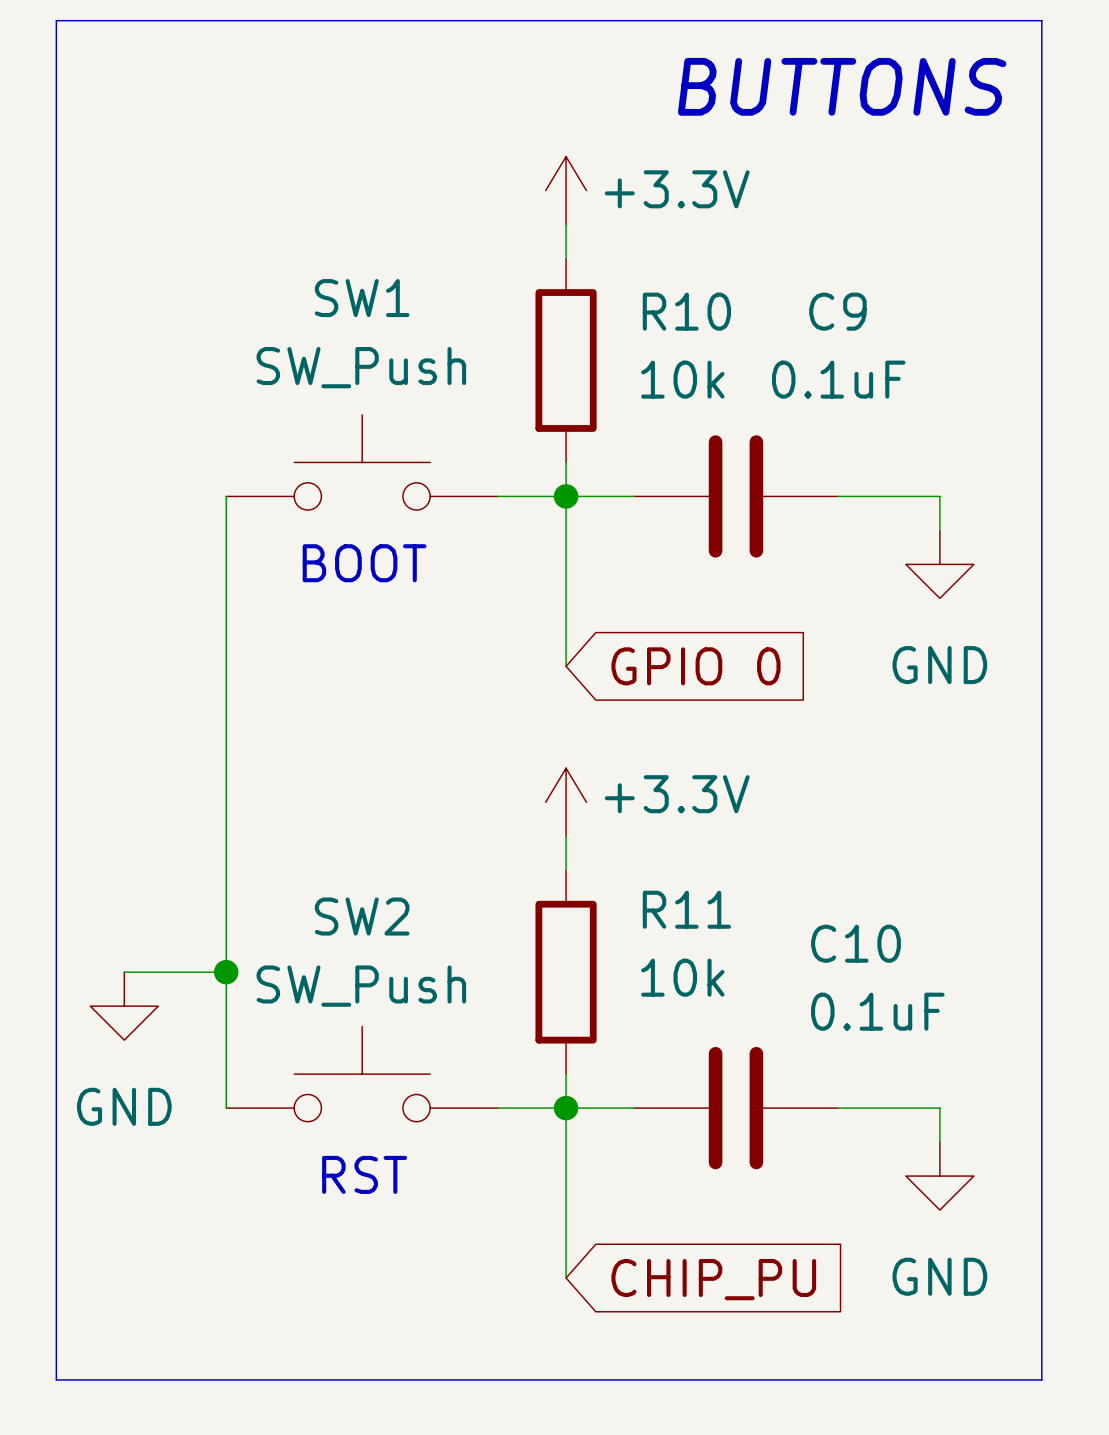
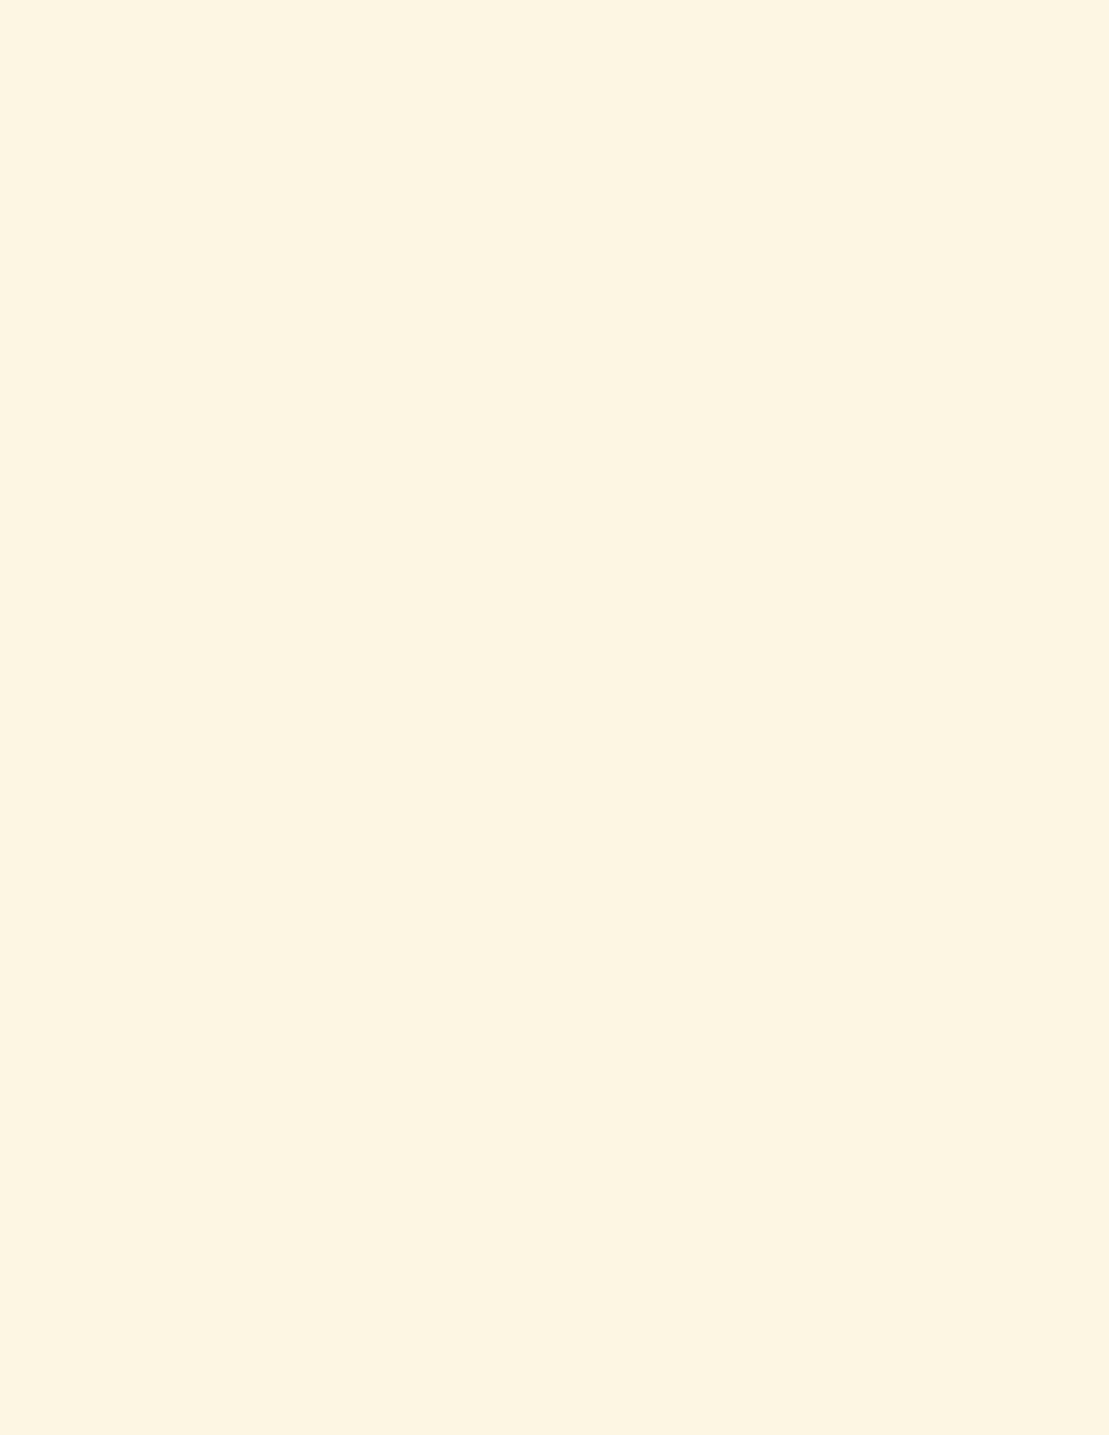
line: (56, 20) (1041, 20) (1041, 1379) (56, 1379) (56, 20) -> none
text: BUTTONS (842, 86) -> none
power symbol: +3.3V (566, 190) -> none
wire: (566, 224) (566, 258) -> none
R10: 10k (566, 360) -> none
SW1: SW_Push (362, 462) -> none
wire: (566, 462) (566, 666) -> none
wire: (226, 496) (226, 1108) -> none
wire: (498, 496) (634, 496) -> none
junction: (566, 496) -> none
C9: 0.1uF (735, 496) -> none
wire: (837, 496) (939, 496) (939, 530) -> none
text: BOOT (364, 563) -> none
power symbol: GND (939, 564) -> none
global label: GPIO 0 (695, 666) -> none
power symbol: +3.3V (566, 802) -> none
wire: (566, 836) (566, 870) -> none
wire: (124, 972) (226, 972) -> none
junction: (226, 972) -> none
R11: 10k (566, 972) -> none
power symbol: GND (124, 1006) -> none
SW2: SW_Push (362, 1074) -> none
wire: (566, 1074) (566, 1278) -> none
wire: (498, 1108) (634, 1108) -> none
junction: (566, 1108) -> none
C10: 0.1uF (735, 1108) -> none
wire: (837, 1108) (939, 1108) (939, 1142) -> none
text: RST (364, 1174) -> none
power symbol: GND (939, 1176) -> none
global label: CHIP_PU (713, 1279) -> none

